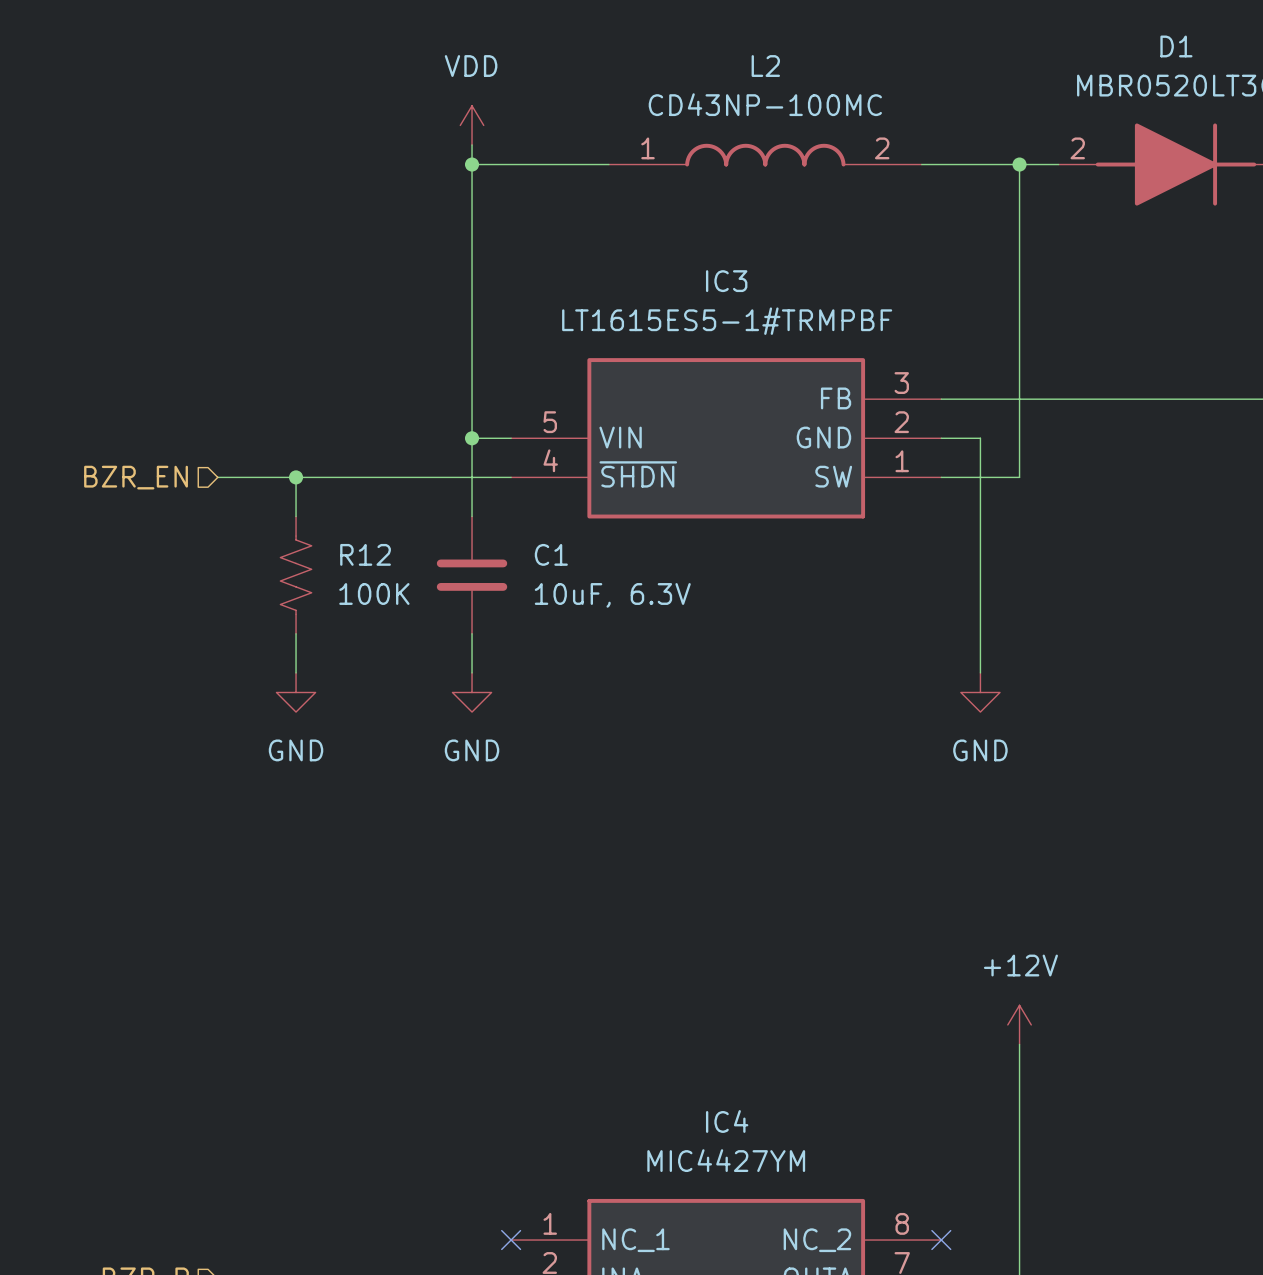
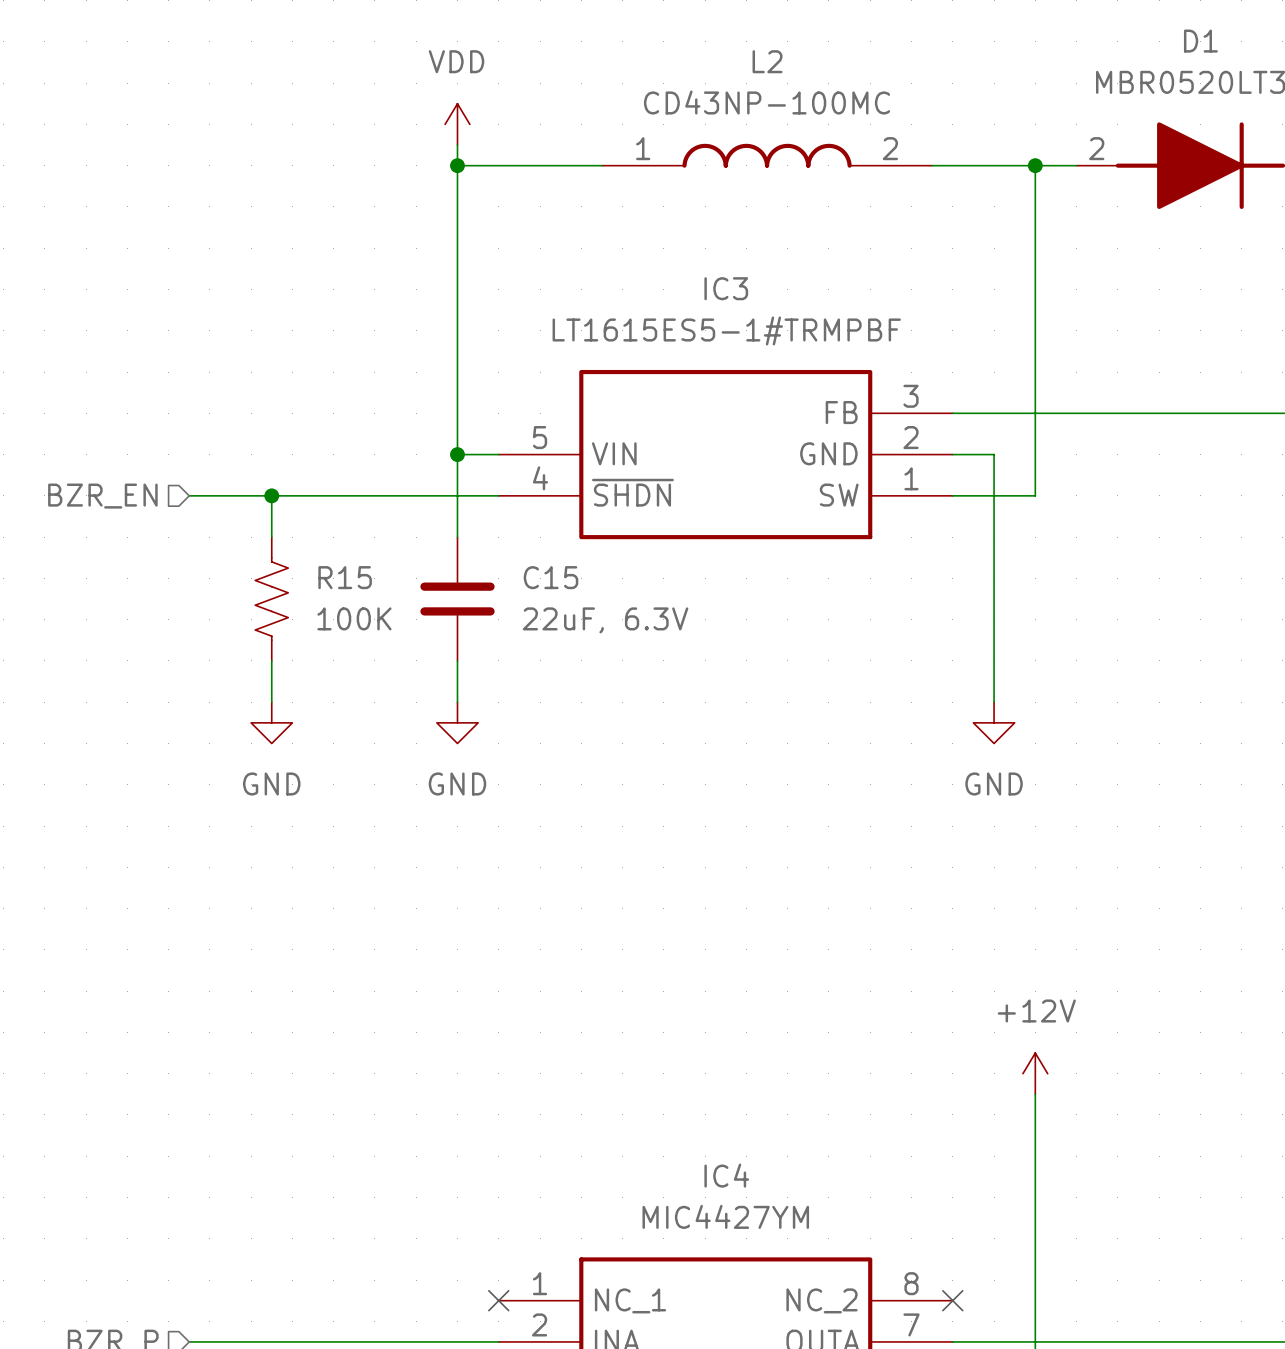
R12 name: R12 (365, 554) -> R15 (345, 577)
C1 name: C1 (551, 554) -> C15 (551, 577)
C1 value: 10uF, 6.3V (612, 595) -> 22uF, 6.3V (605, 620)

